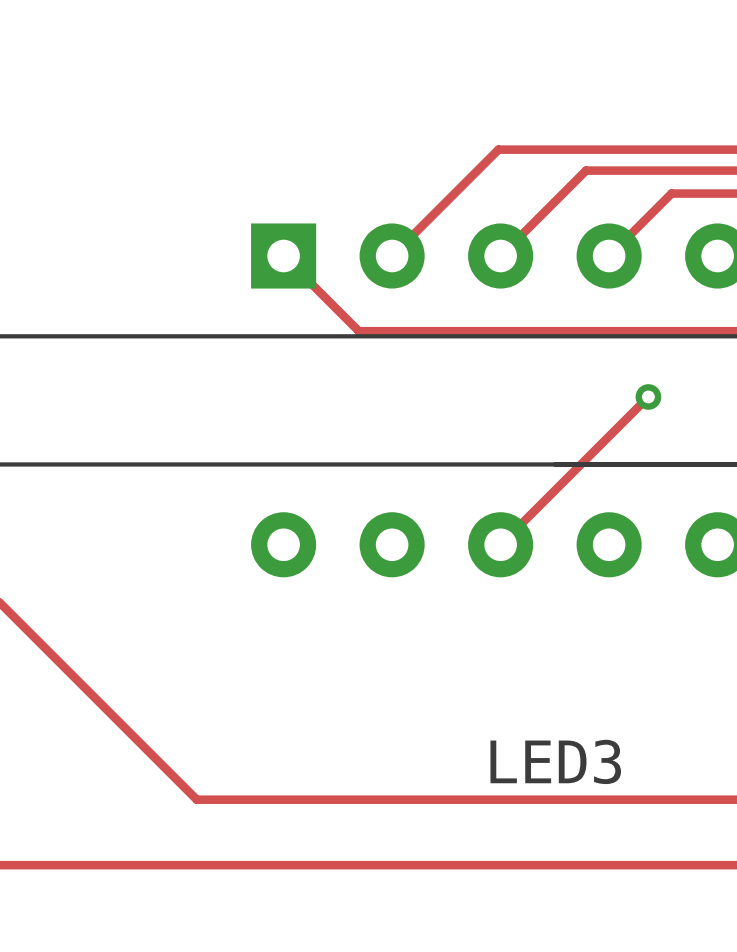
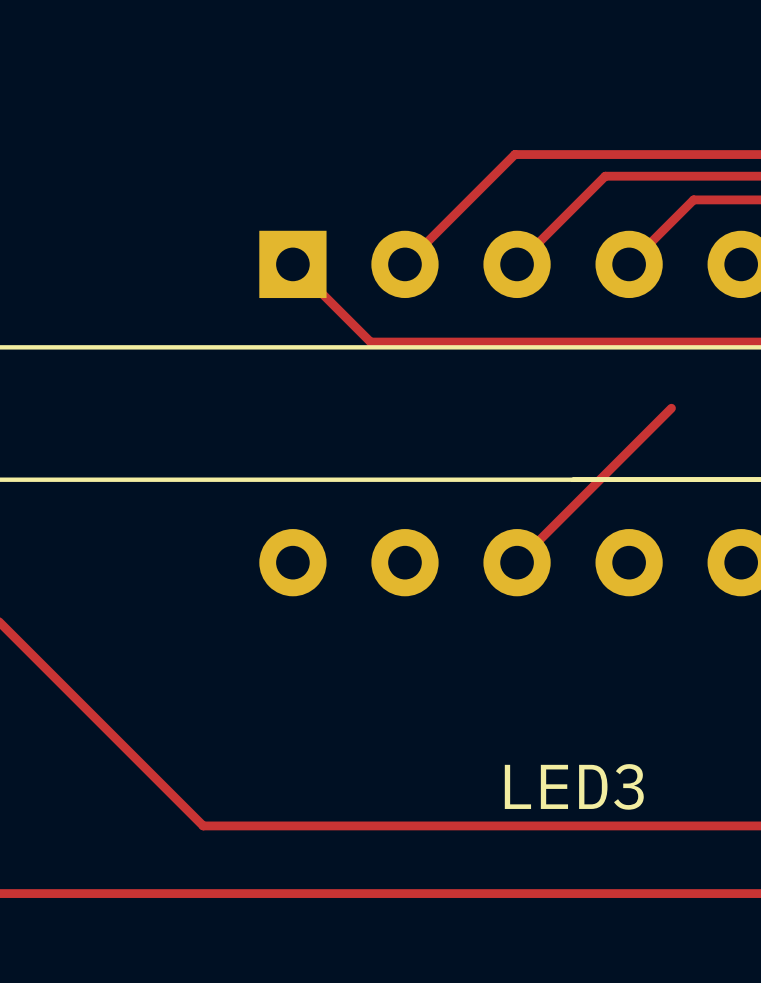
via: (648, 396) -> none

